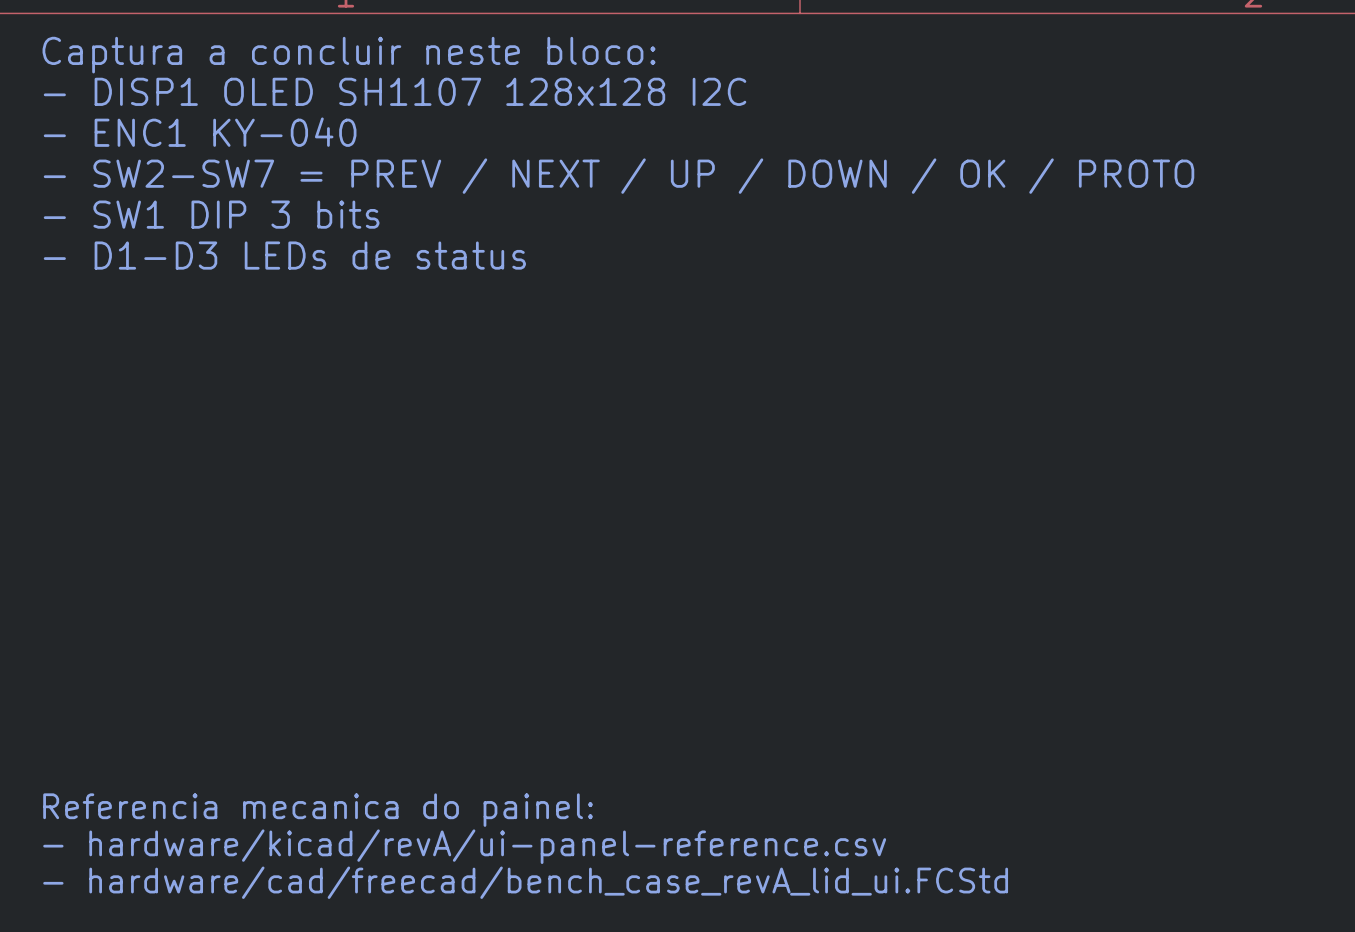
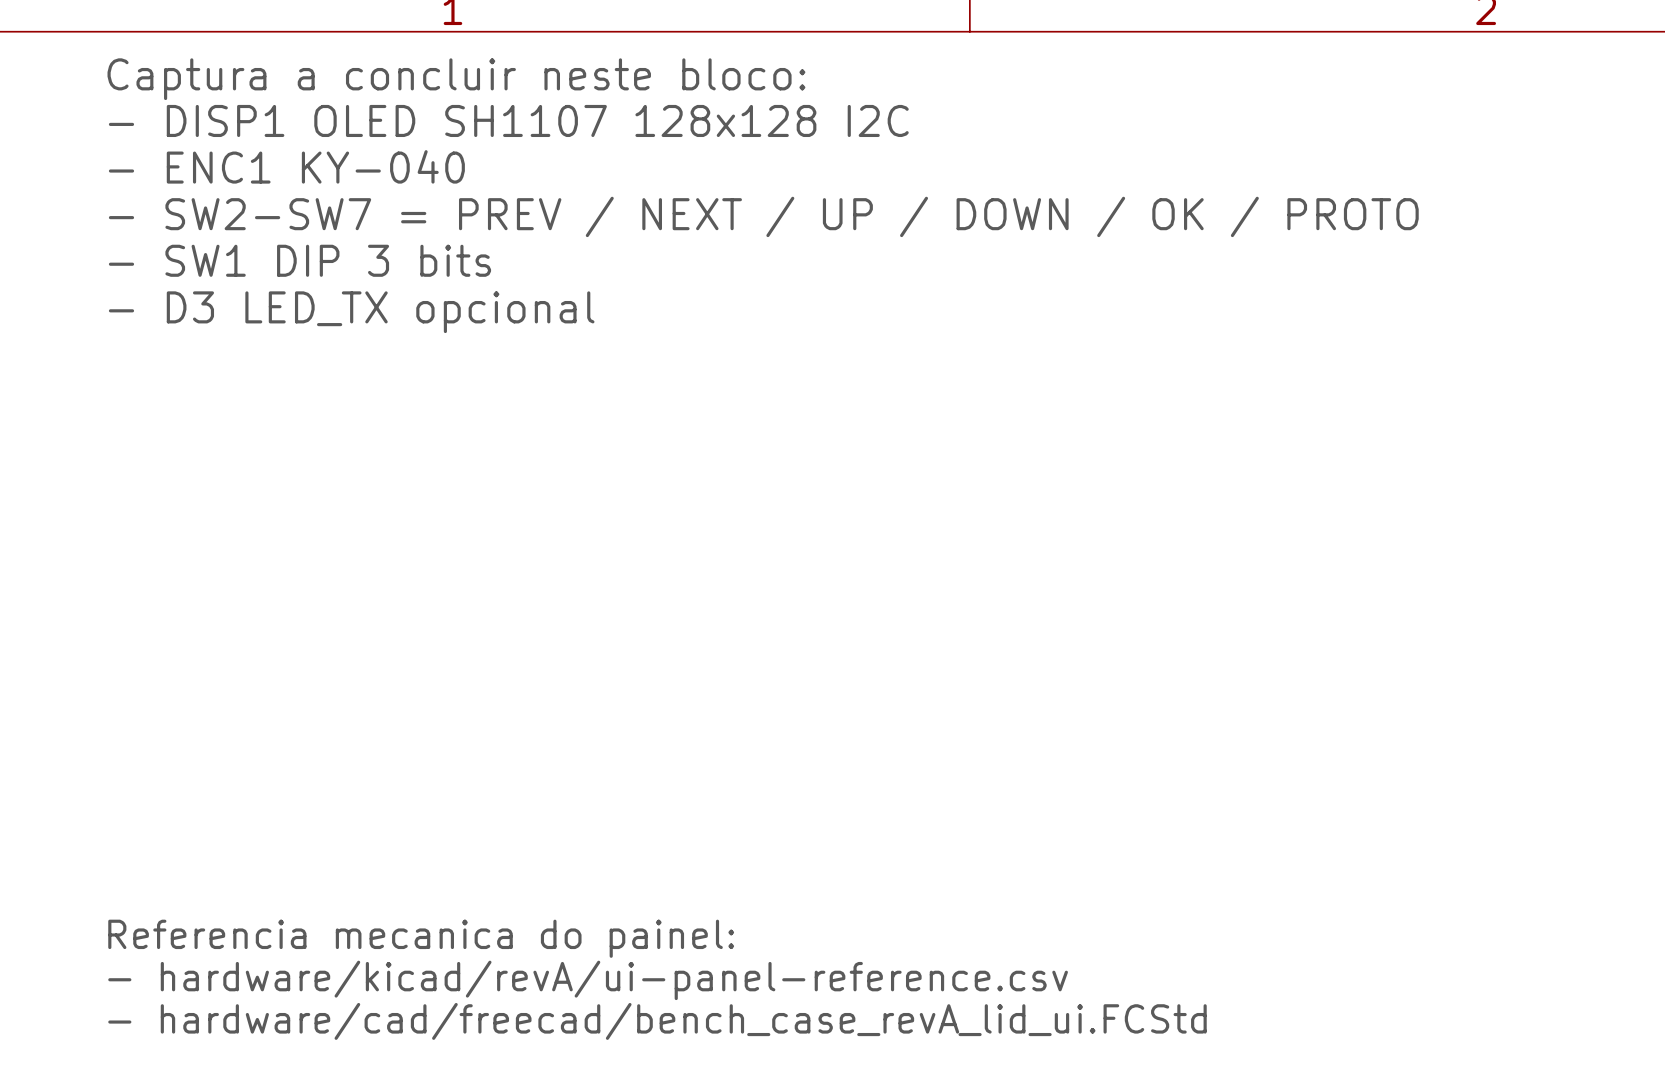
text: - D1-D3 LEDs de status (284, 255) -> - D3 LED_TX opcional (351, 312)

